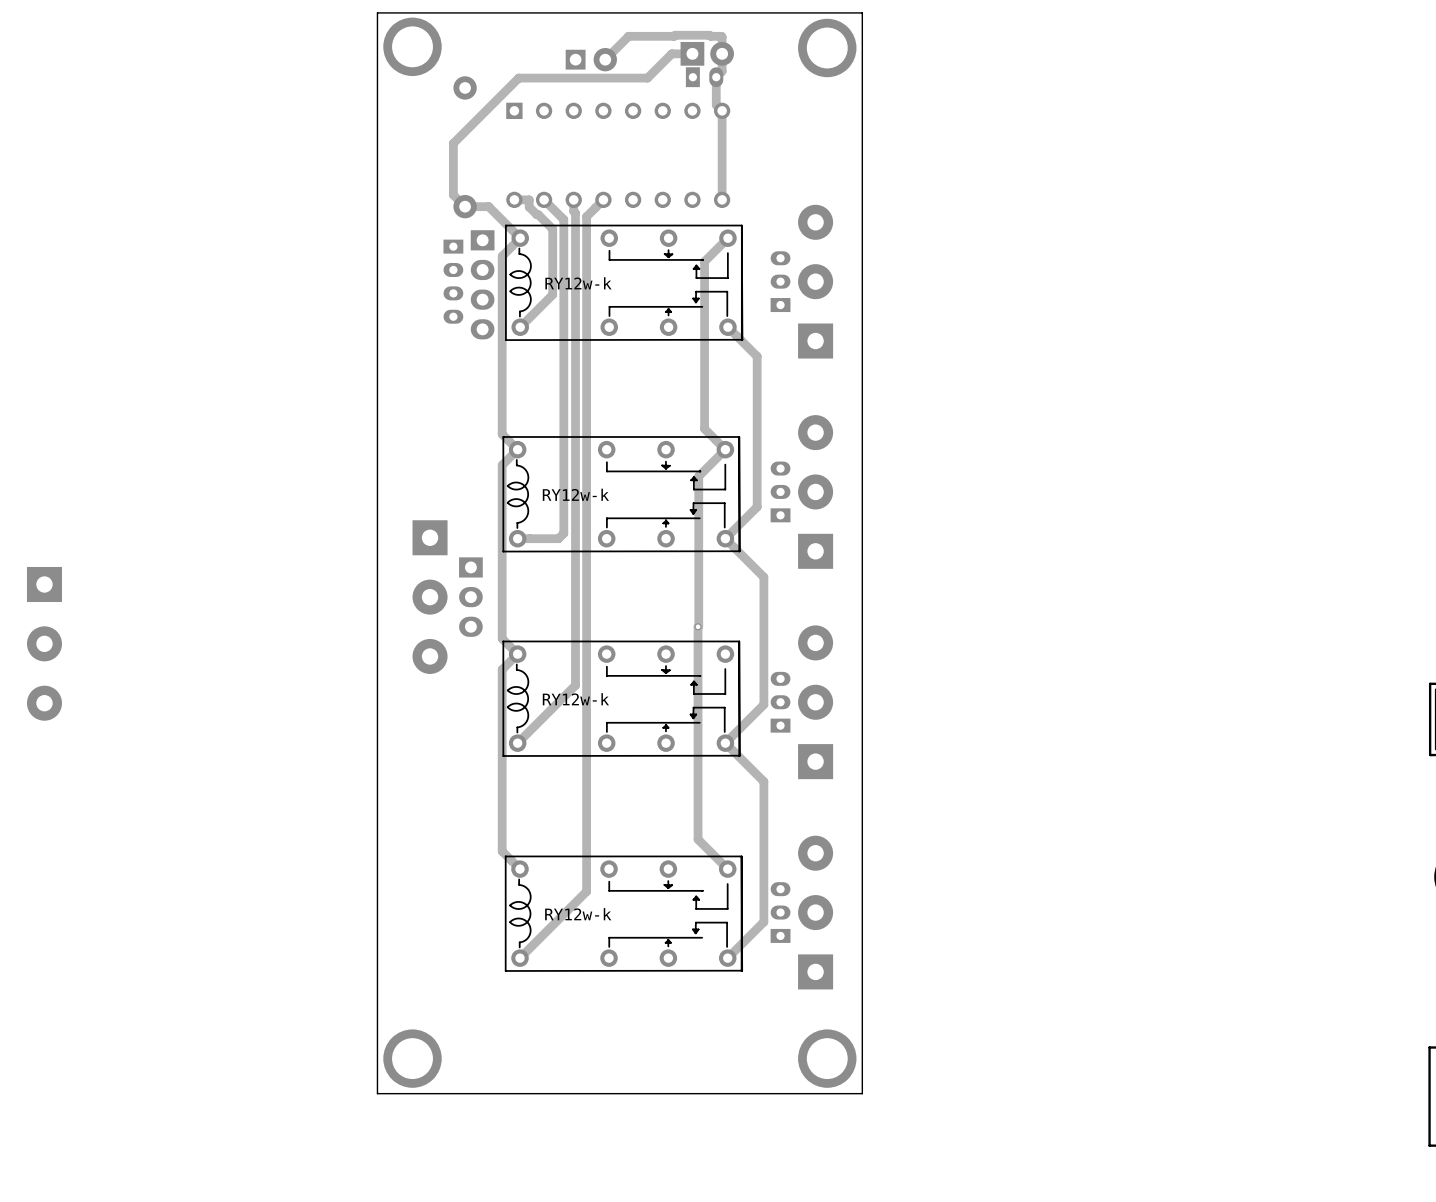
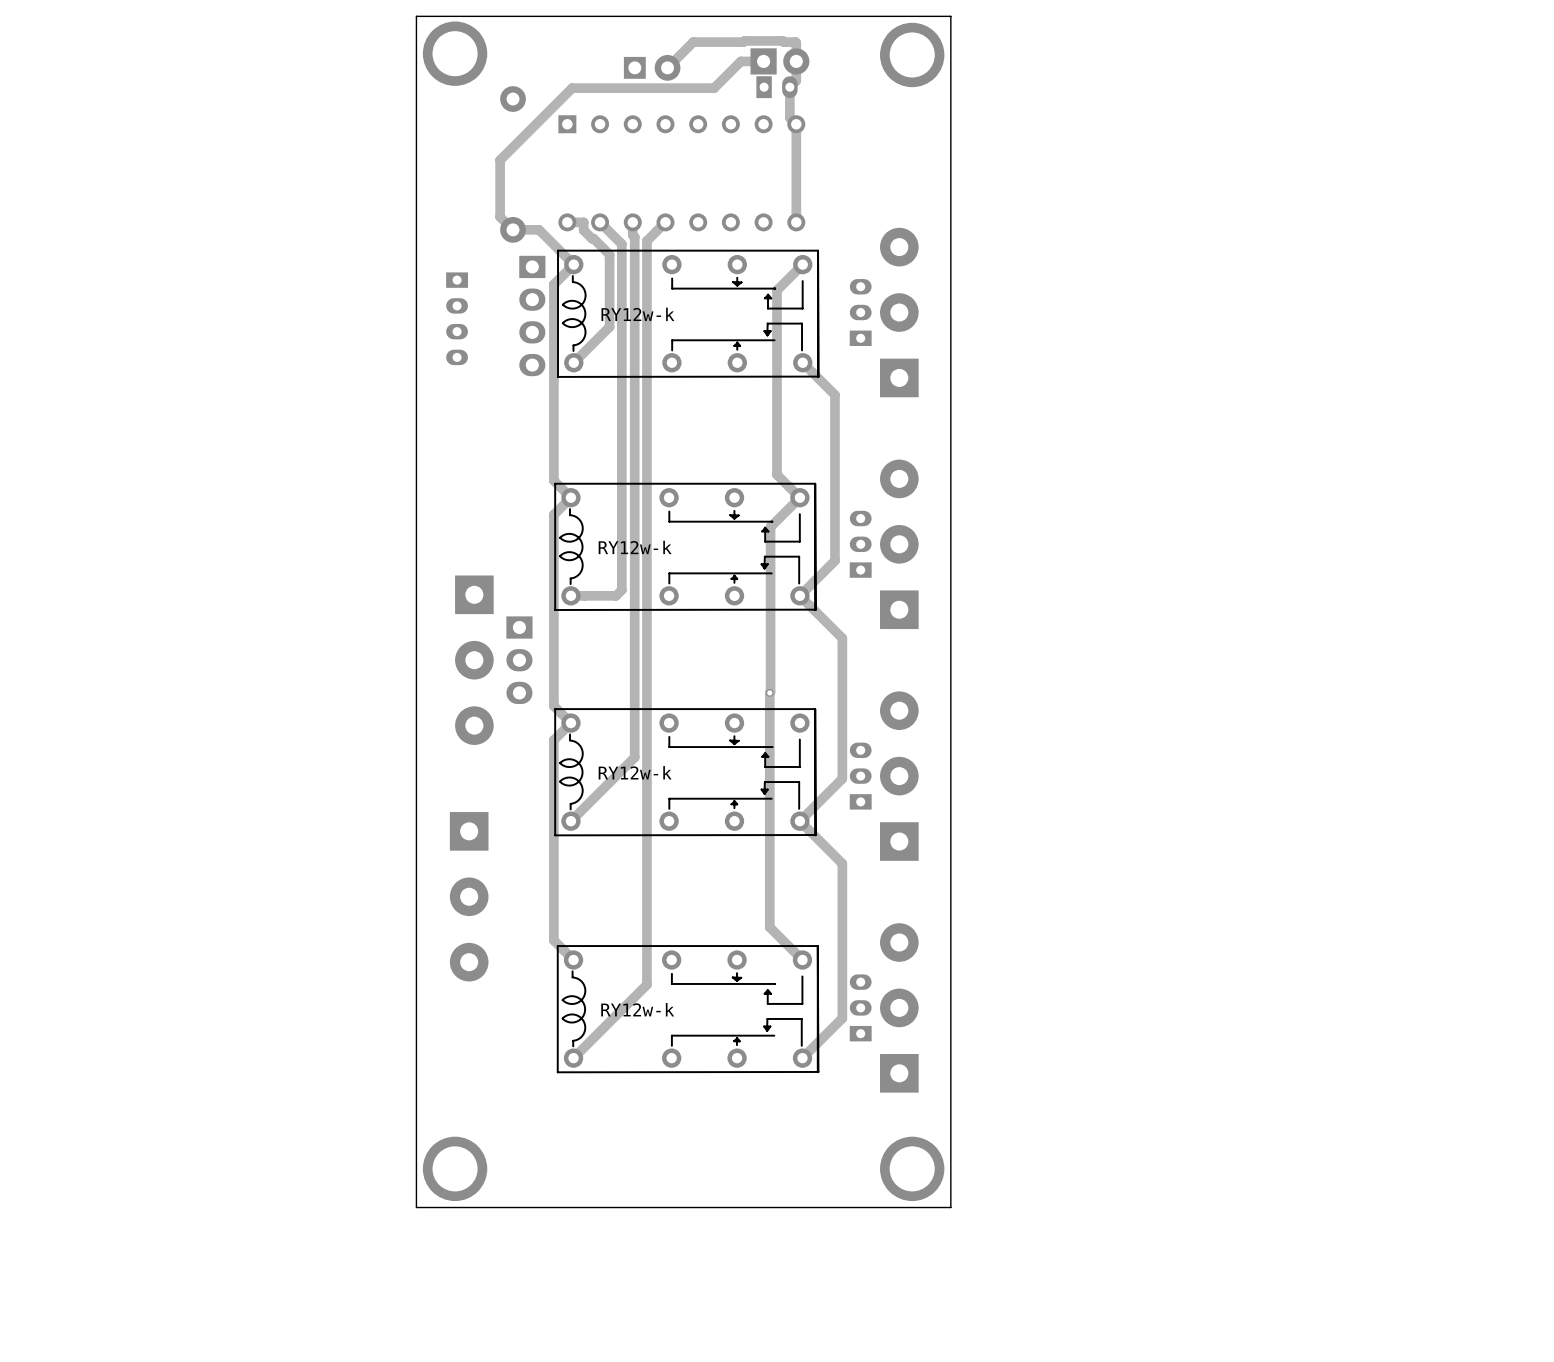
part position: (453, 281) -> (457, 318)
part: (44, 643) -> none
part: none -> (469, 896)

